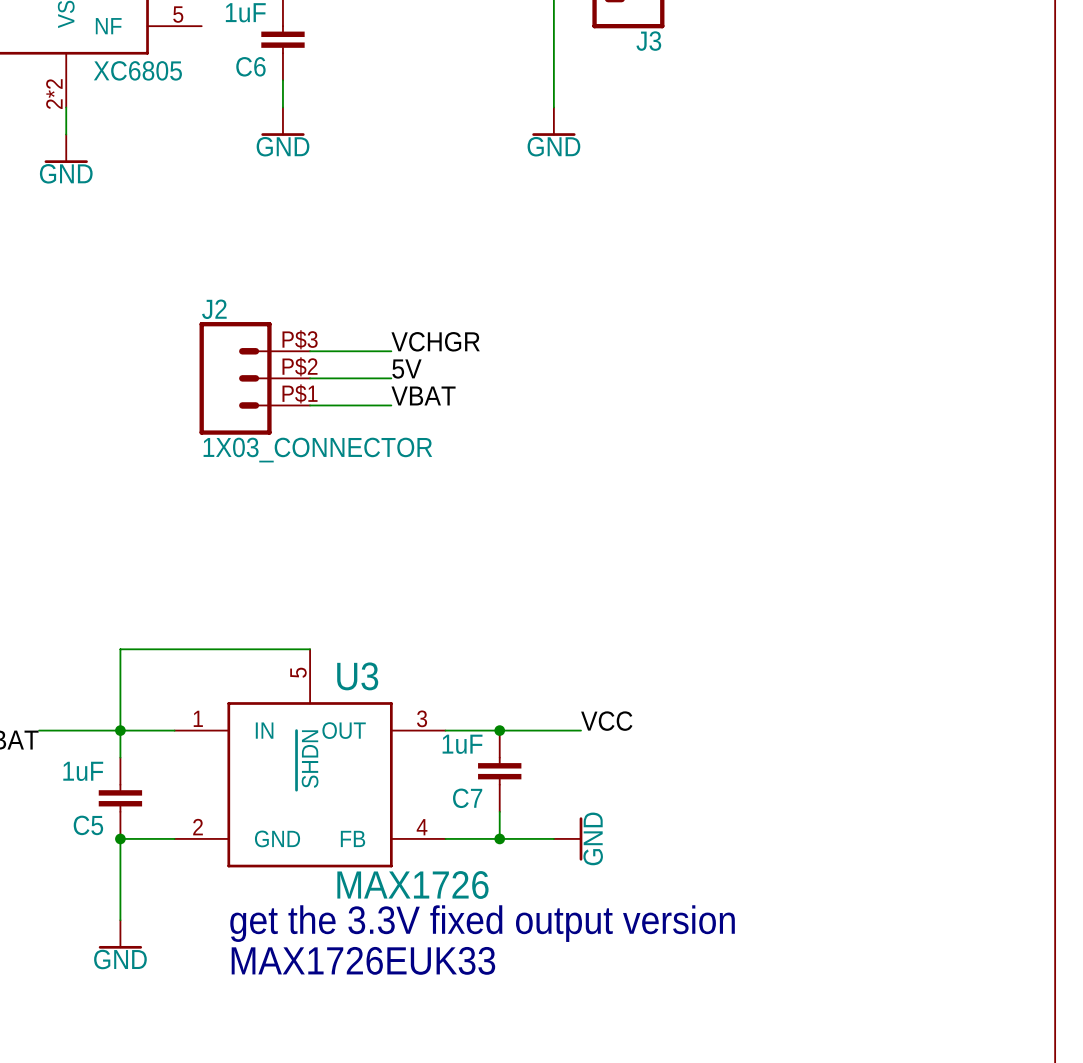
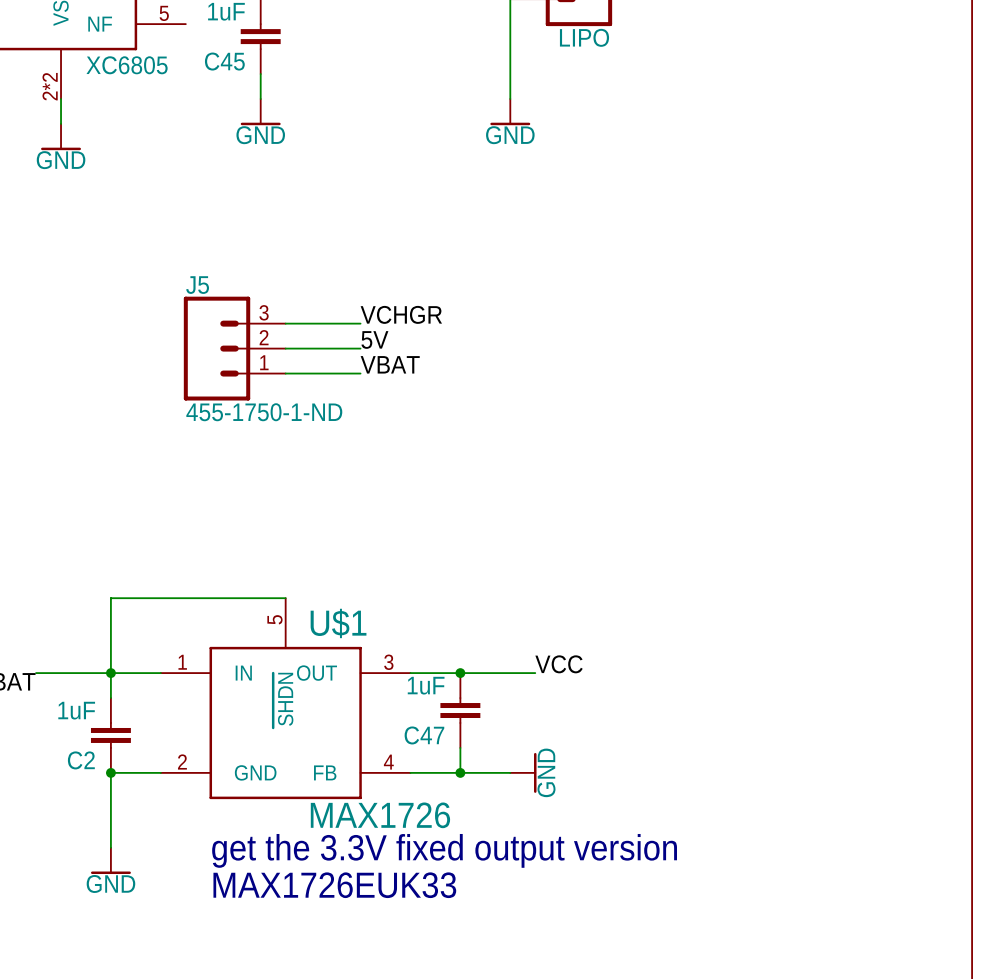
J3 name: J3 (648, 41) -> LIPO (584, 37)
C6 name: C6 (250, 66) -> C45 (224, 61)
J2 name: J2 (214, 309) -> J5 (197, 285)
J2 pin number: P$3 (300, 339) -> 3 (264, 312)
J2 pin number: P$2 (299, 366) -> 2 (264, 337)
J2 pin number: P$1 (300, 393) -> 1 (264, 362)
J2 value: 1X03_CONNECTOR (317, 450) -> 455-1750-1-ND (264, 412)
U3 name: U3 (357, 676) -> U$1 (338, 623)
C7 name: C7 (467, 798) -> C47 (424, 735)
C5 name: C5 (88, 825) -> C2 (81, 760)

